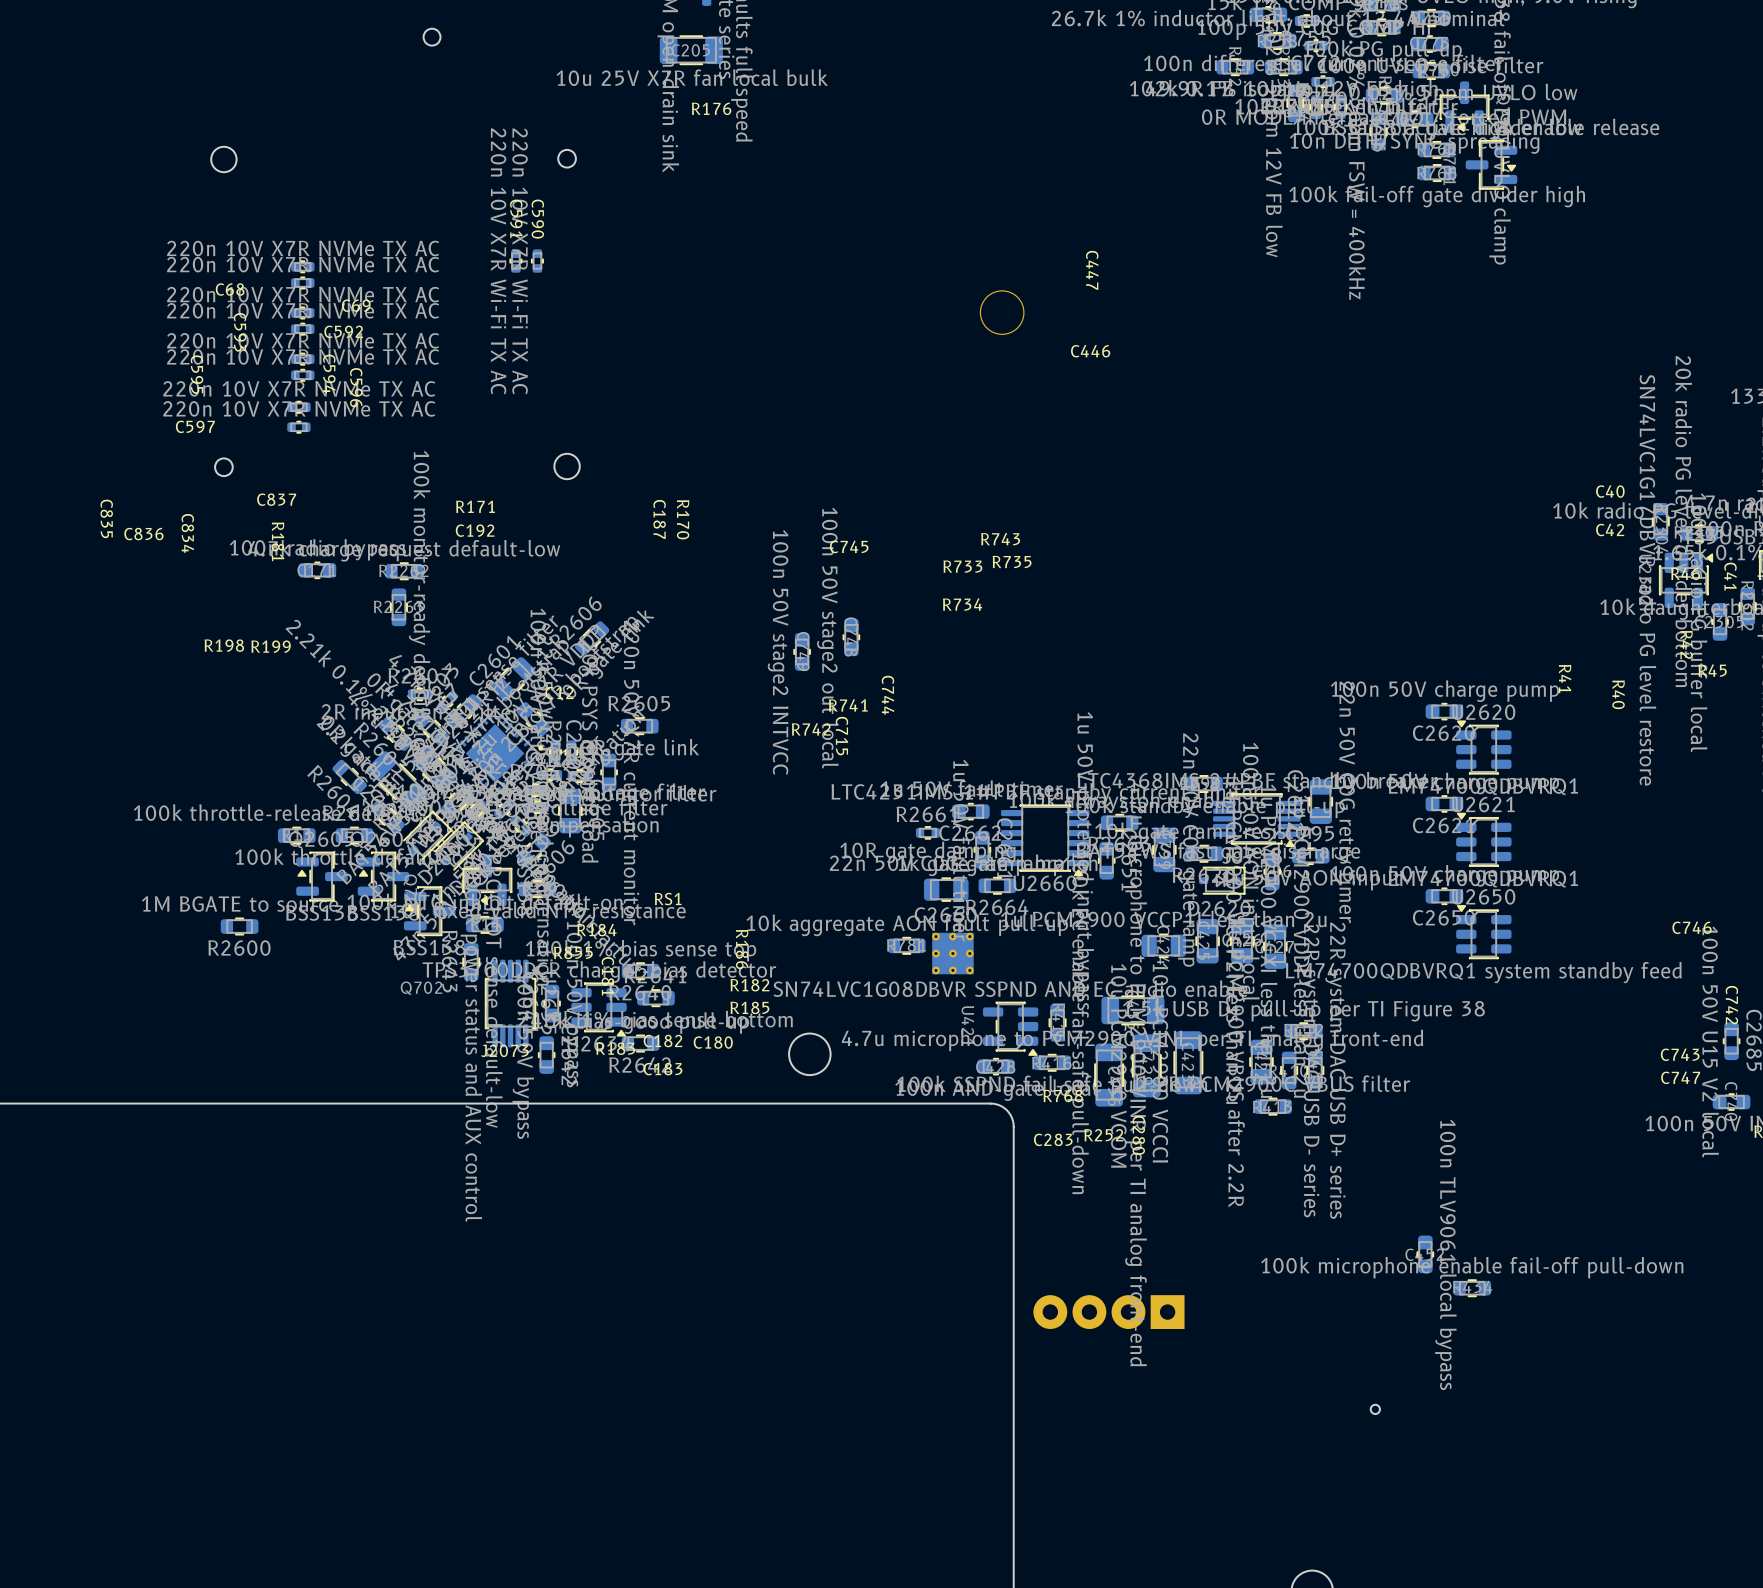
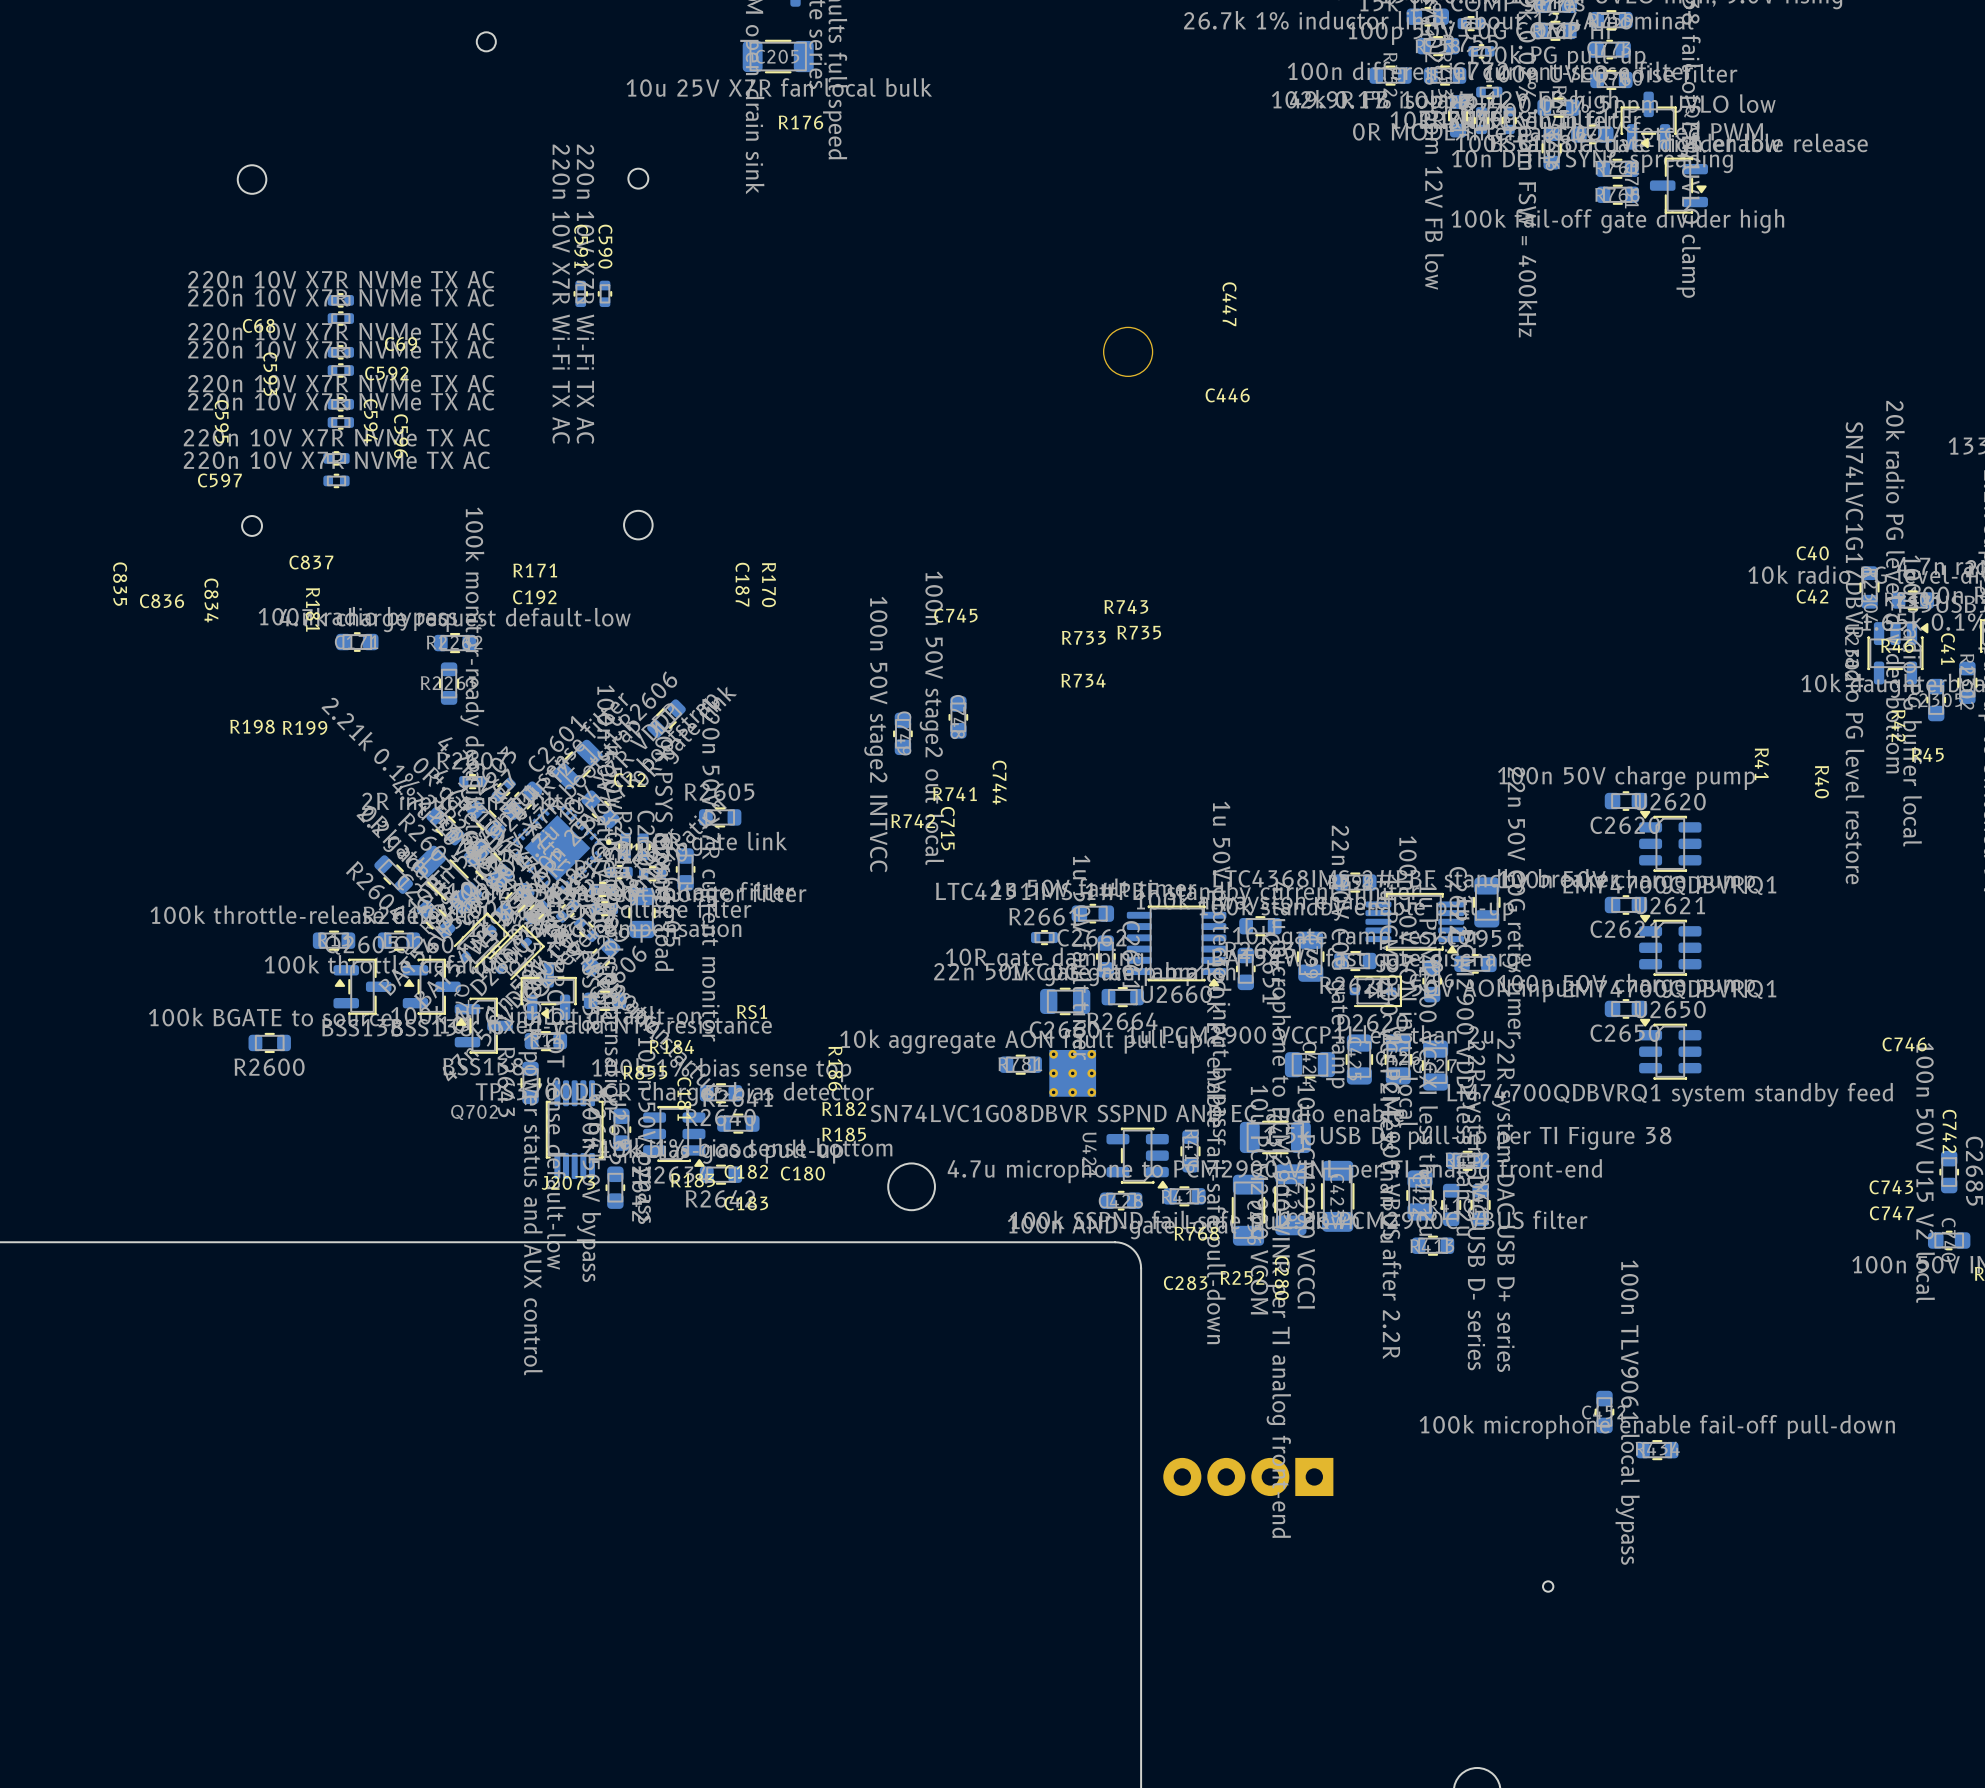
R2600 value: 1M BGATE to source (240, 904) -> 100k BGATE to source (270, 1017)

